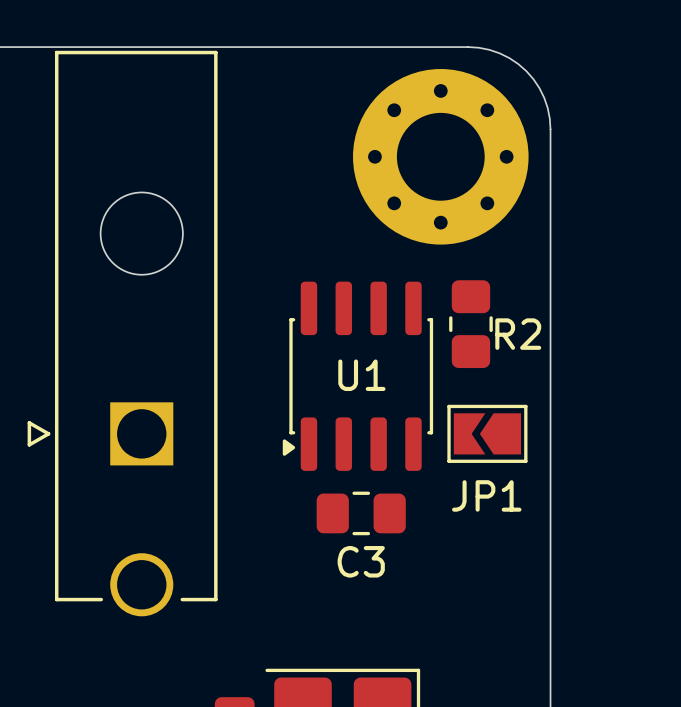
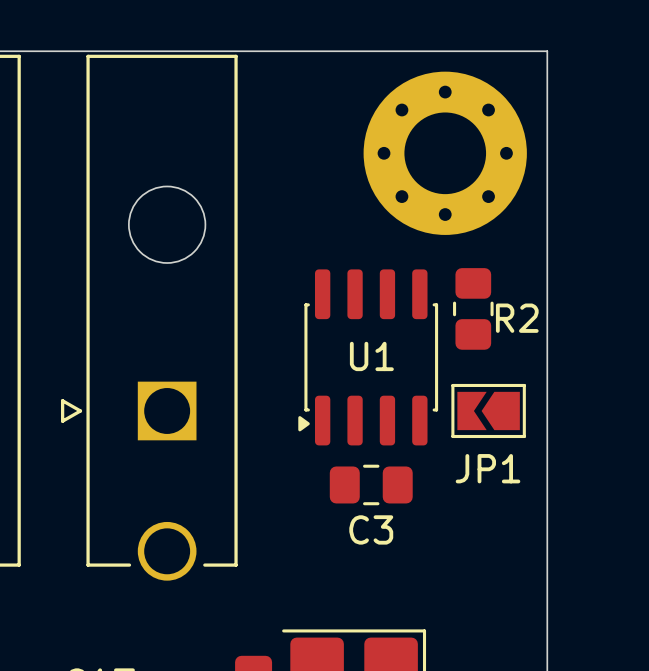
board edge: (468, 47) (499, 53) (526, 71) (544, 97) (550, 129) -> (470, 51) (547, 51) (547, 127)

